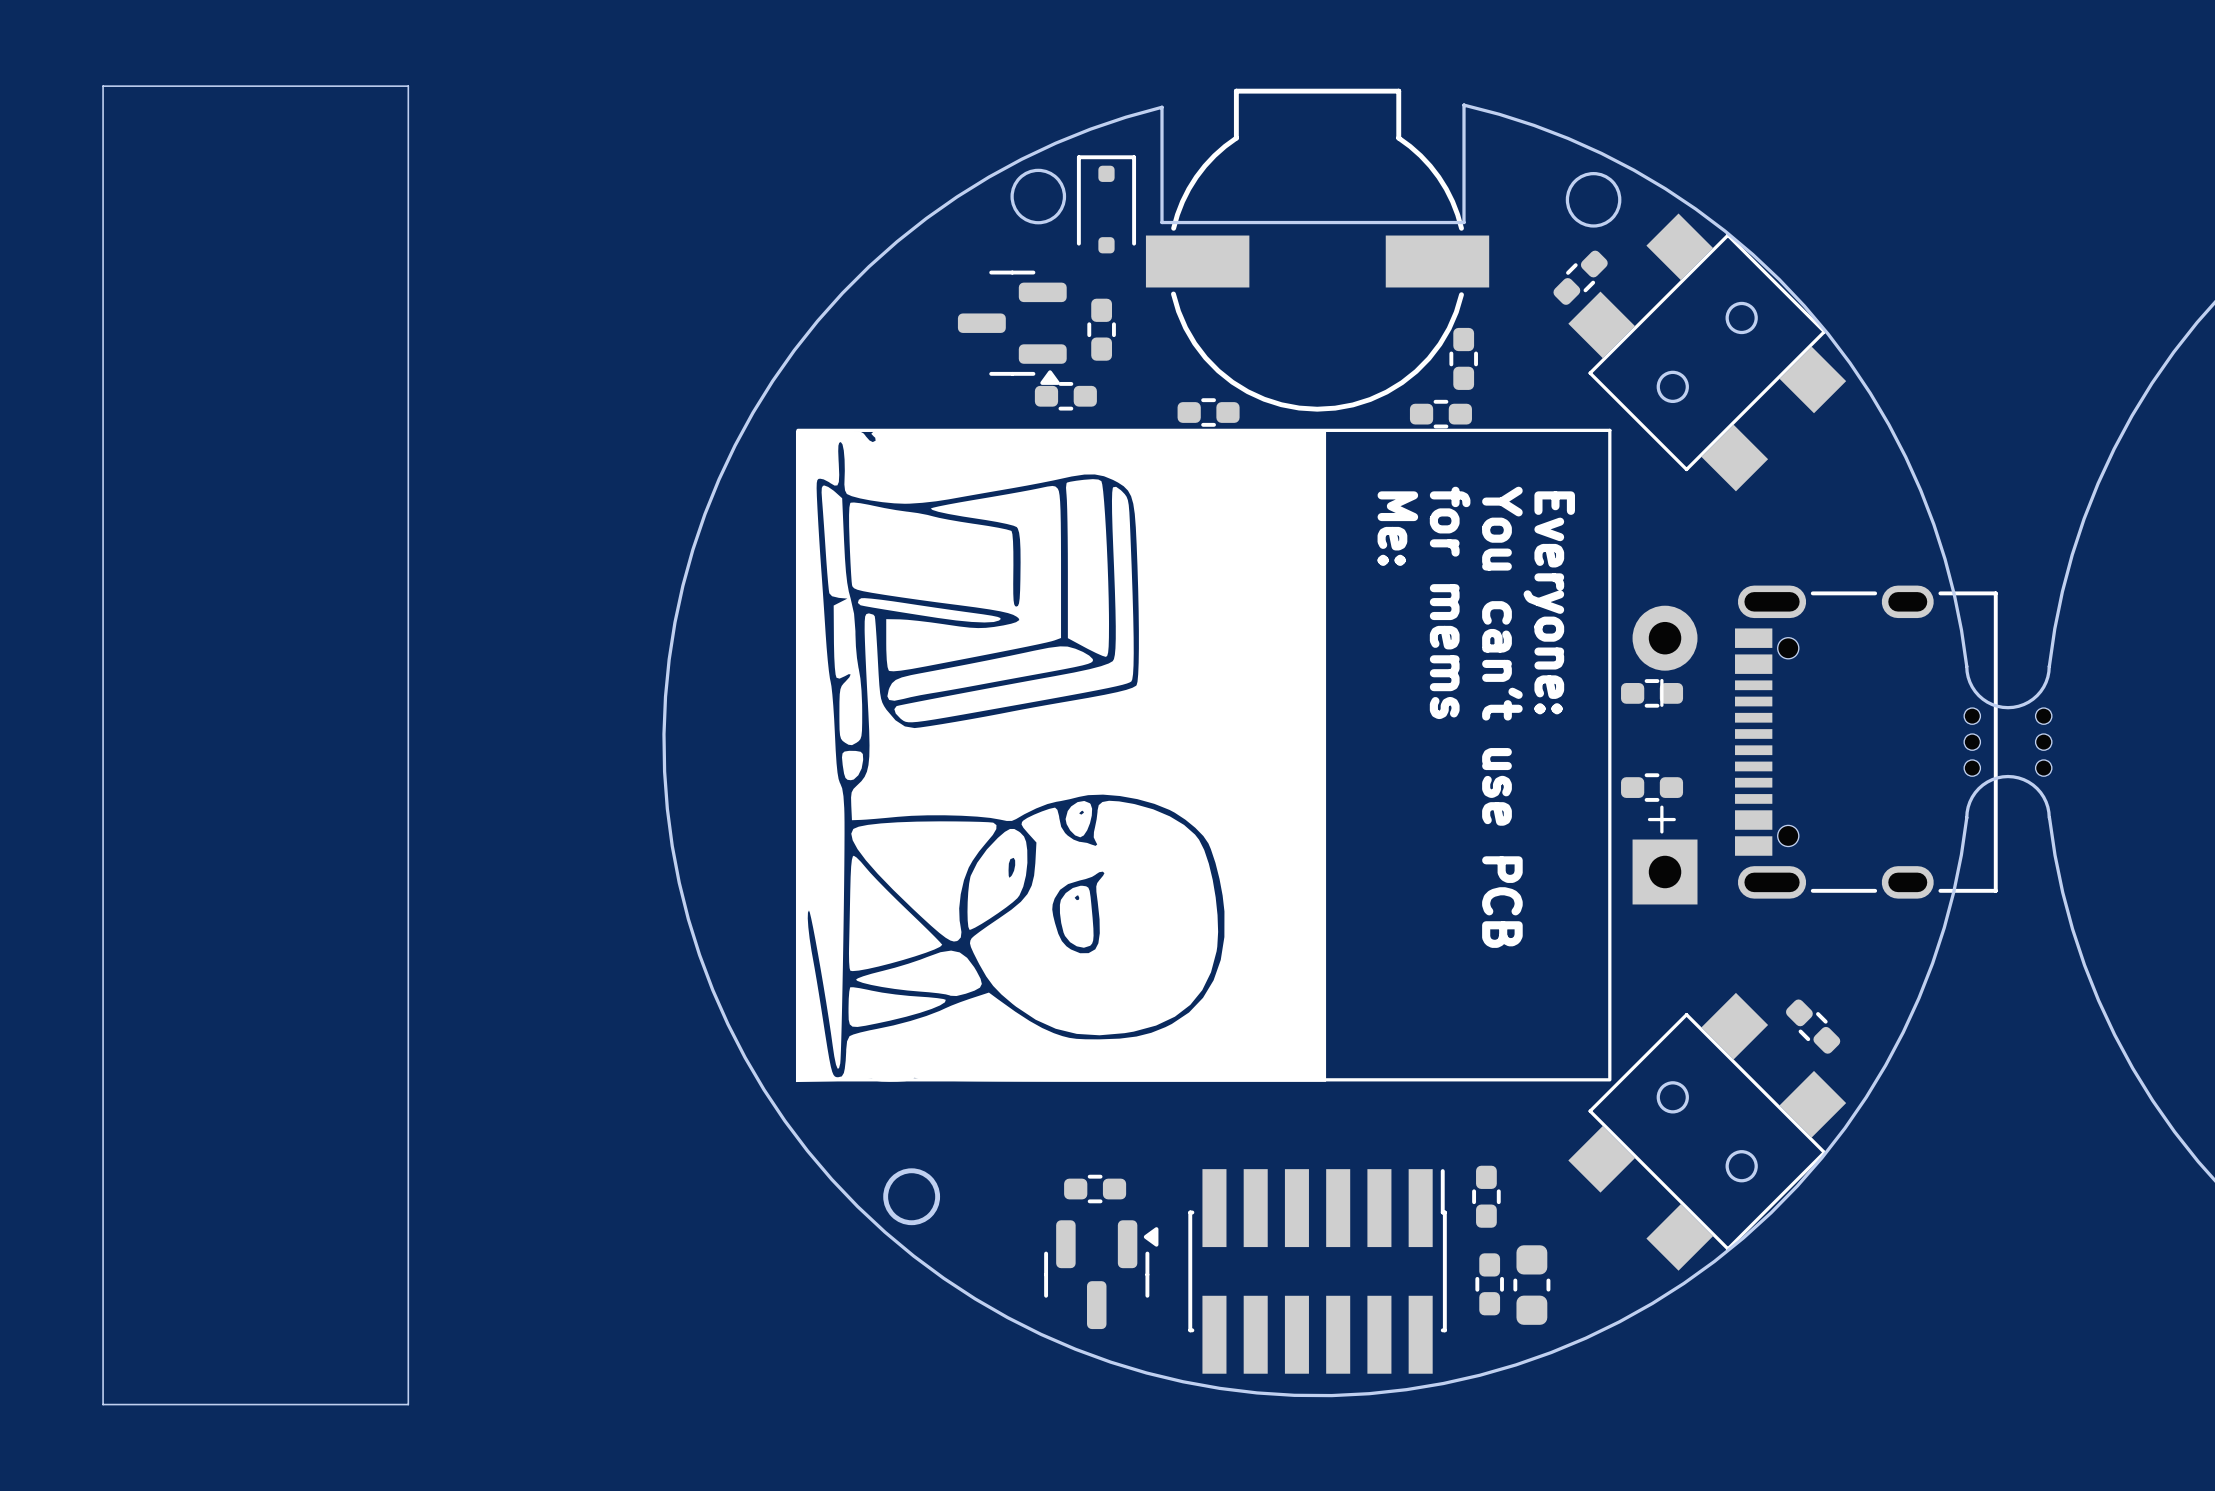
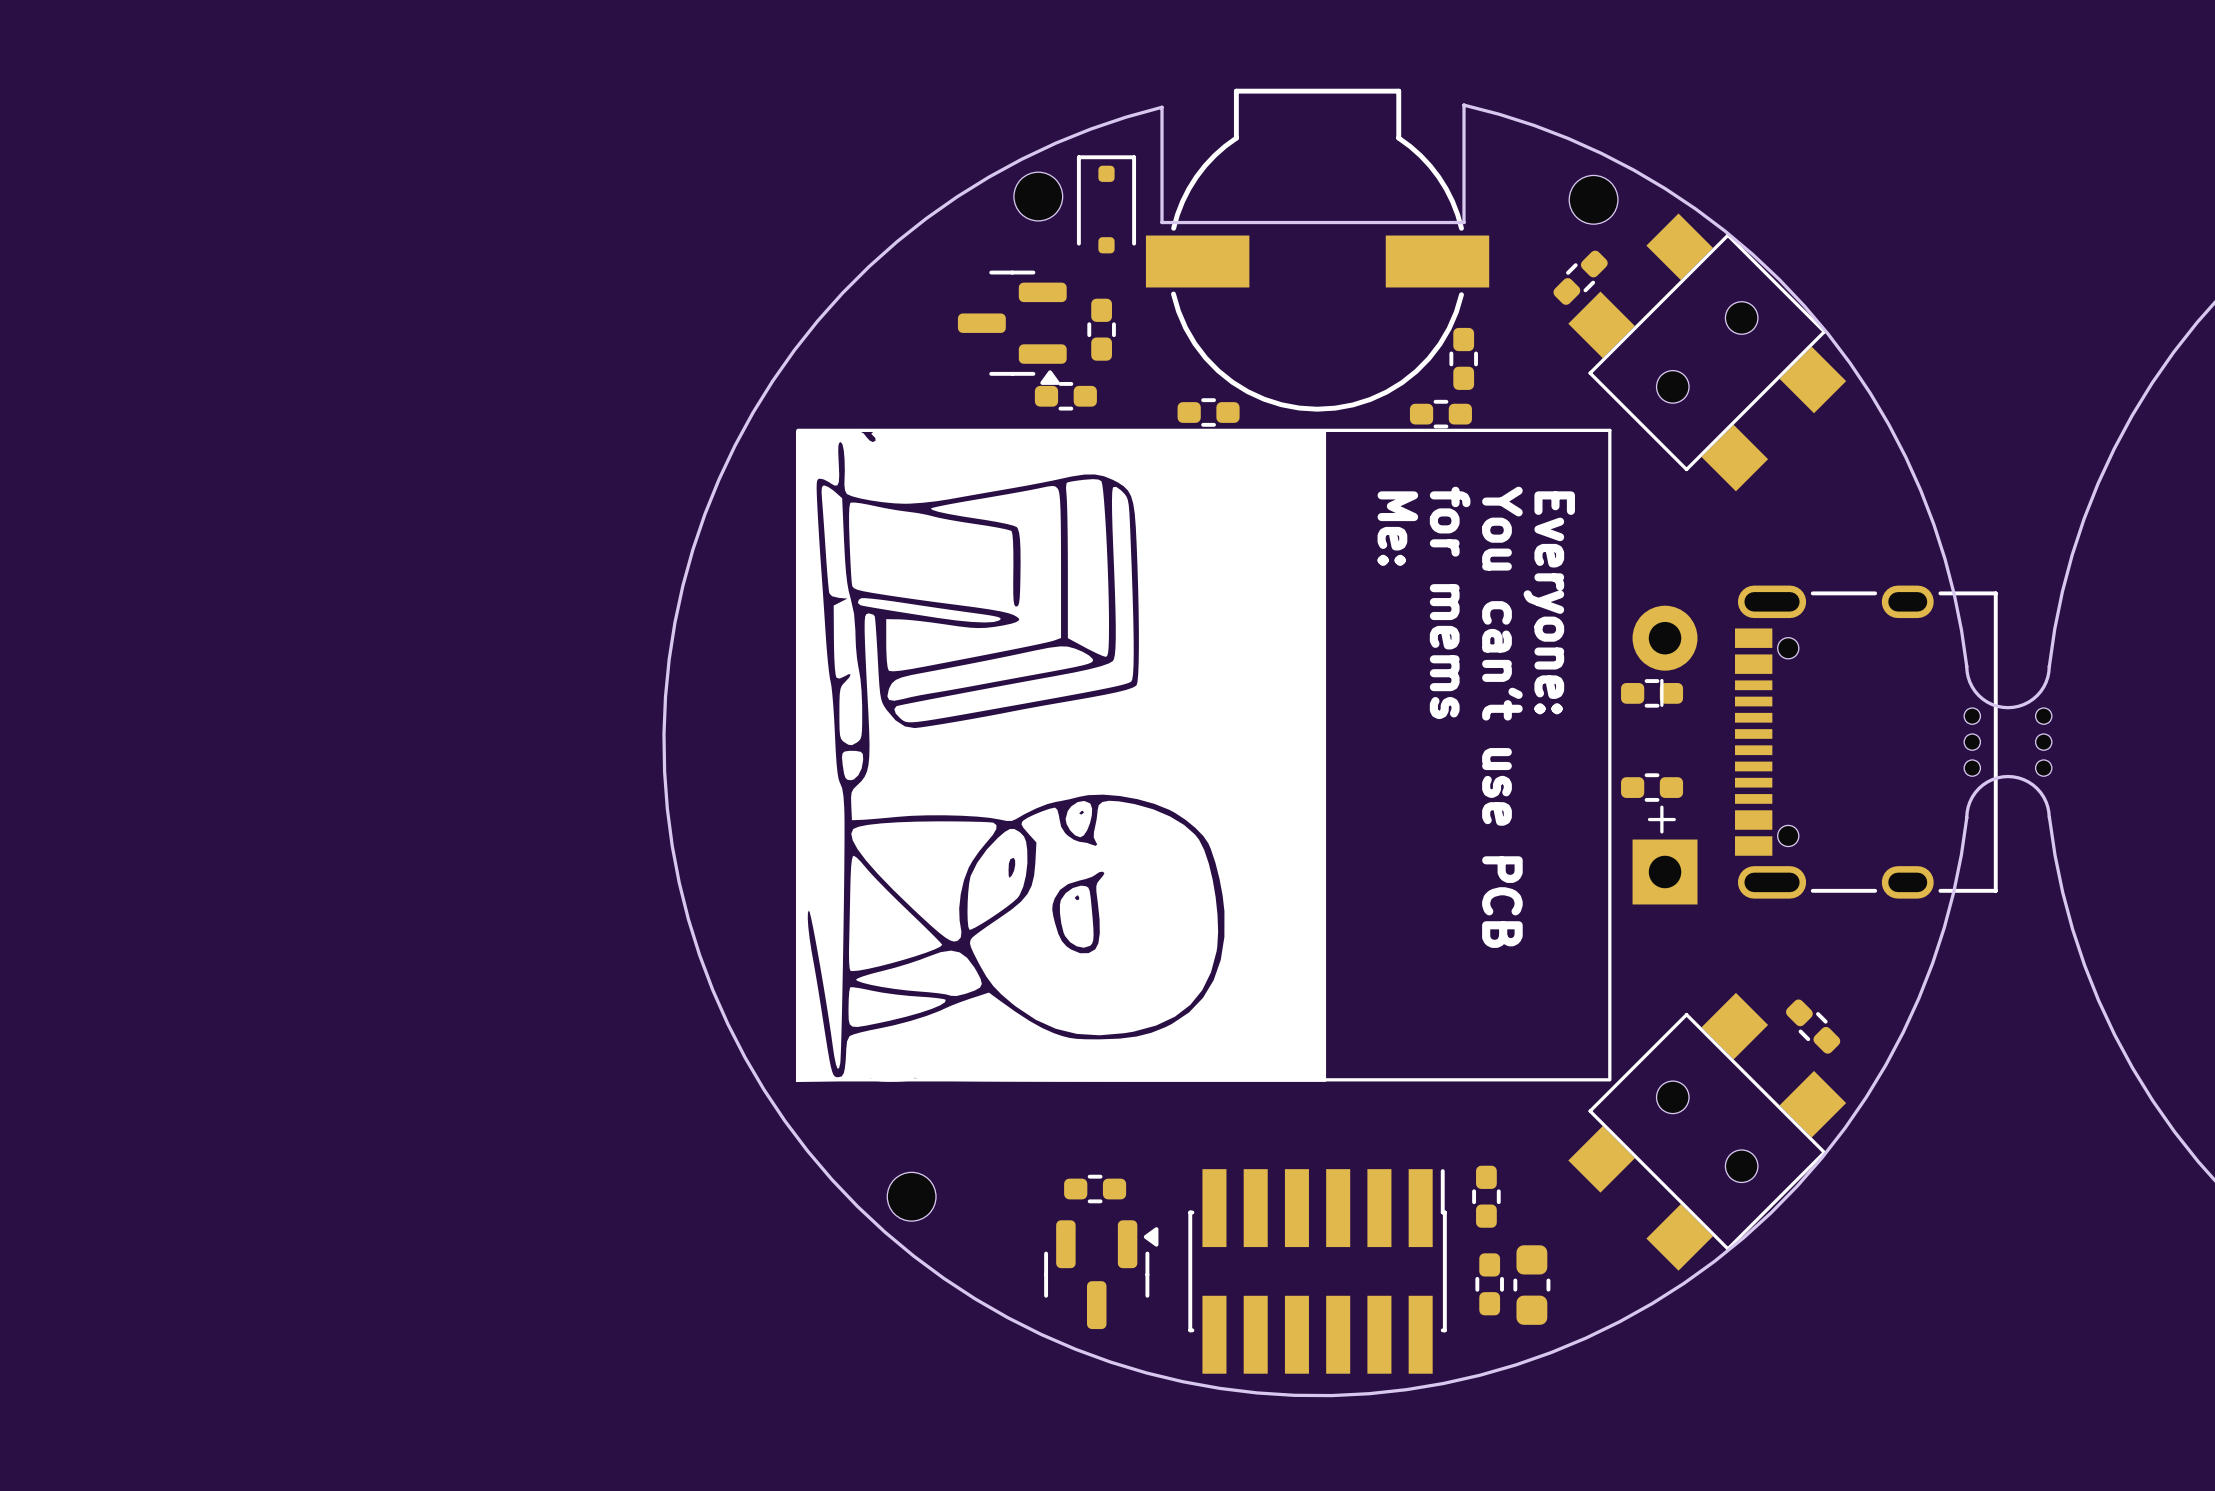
board edge: (408, 86) (103, 86) (103, 1404) (408, 1404) (408, 86) -> none
round board edge: [1010, 168, 1067, 225] -> none
round board edge: [1565, 172, 1622, 228] -> none
part: none -> (1038, 196)
part: none -> (1593, 199)
part footprint: [1568, 213, 1847, 492] -> [1568, 213, 1847, 492]
part footprint: [1568, 992, 1847, 1271] -> [1568, 992, 1847, 1271]
round board edge: [883, 1168, 941, 1226] -> none
part: none -> (911, 1196)

